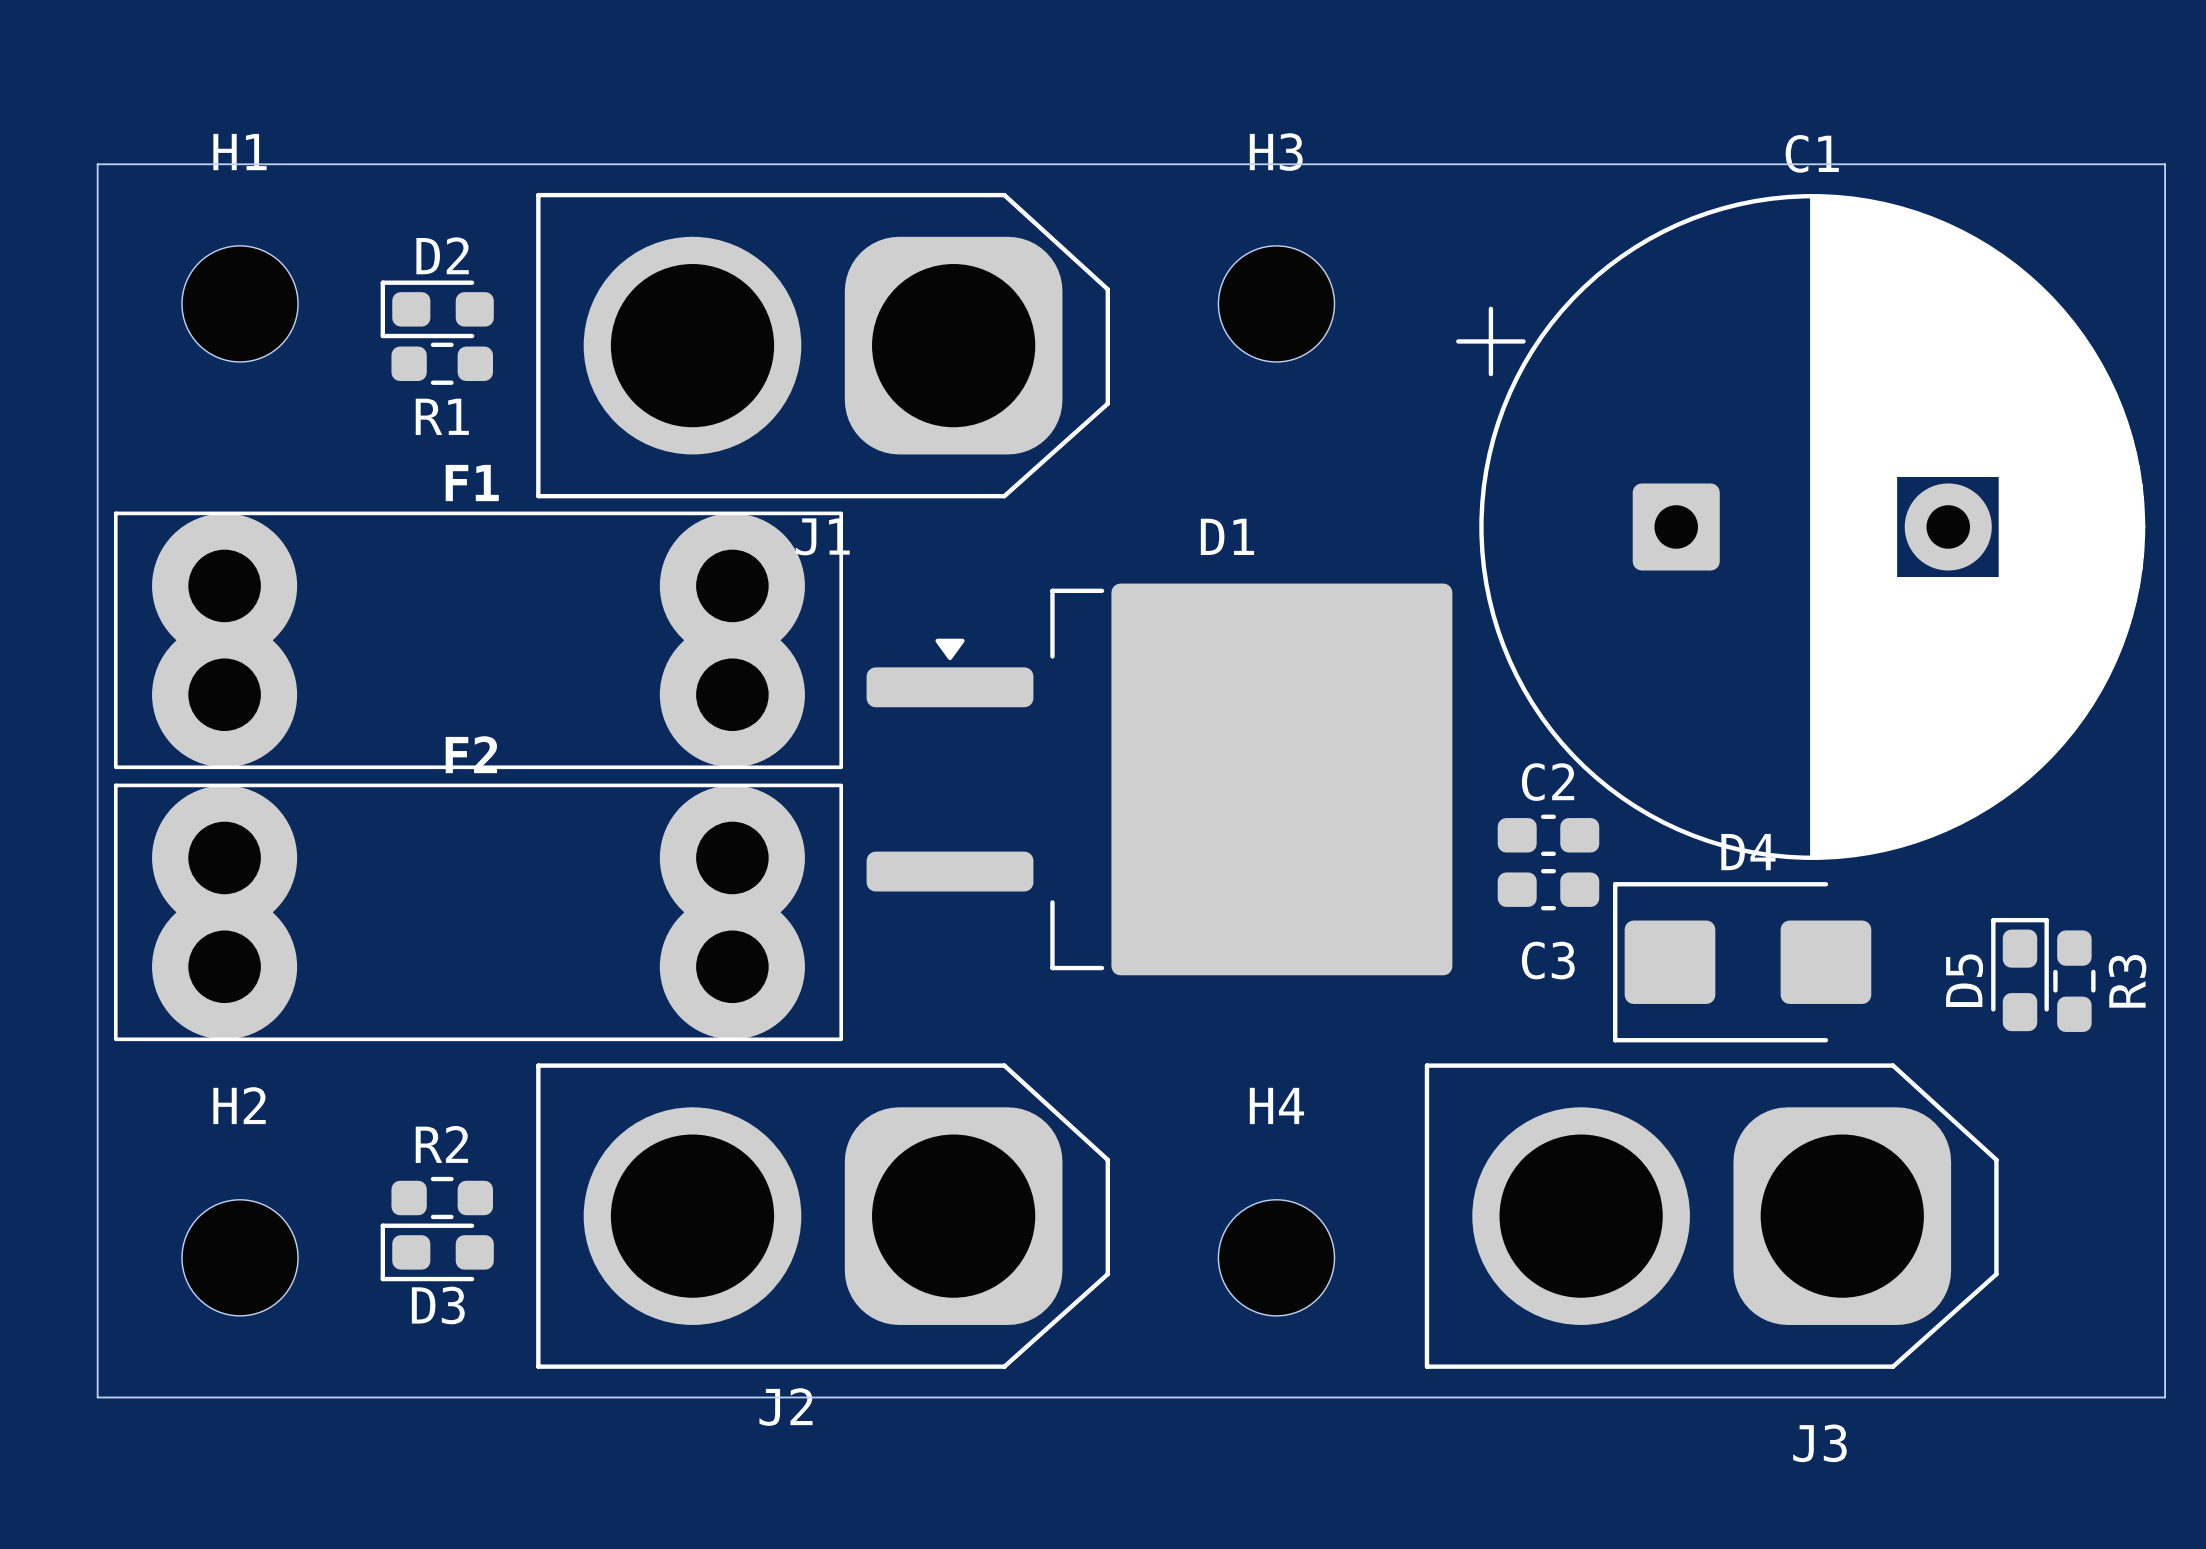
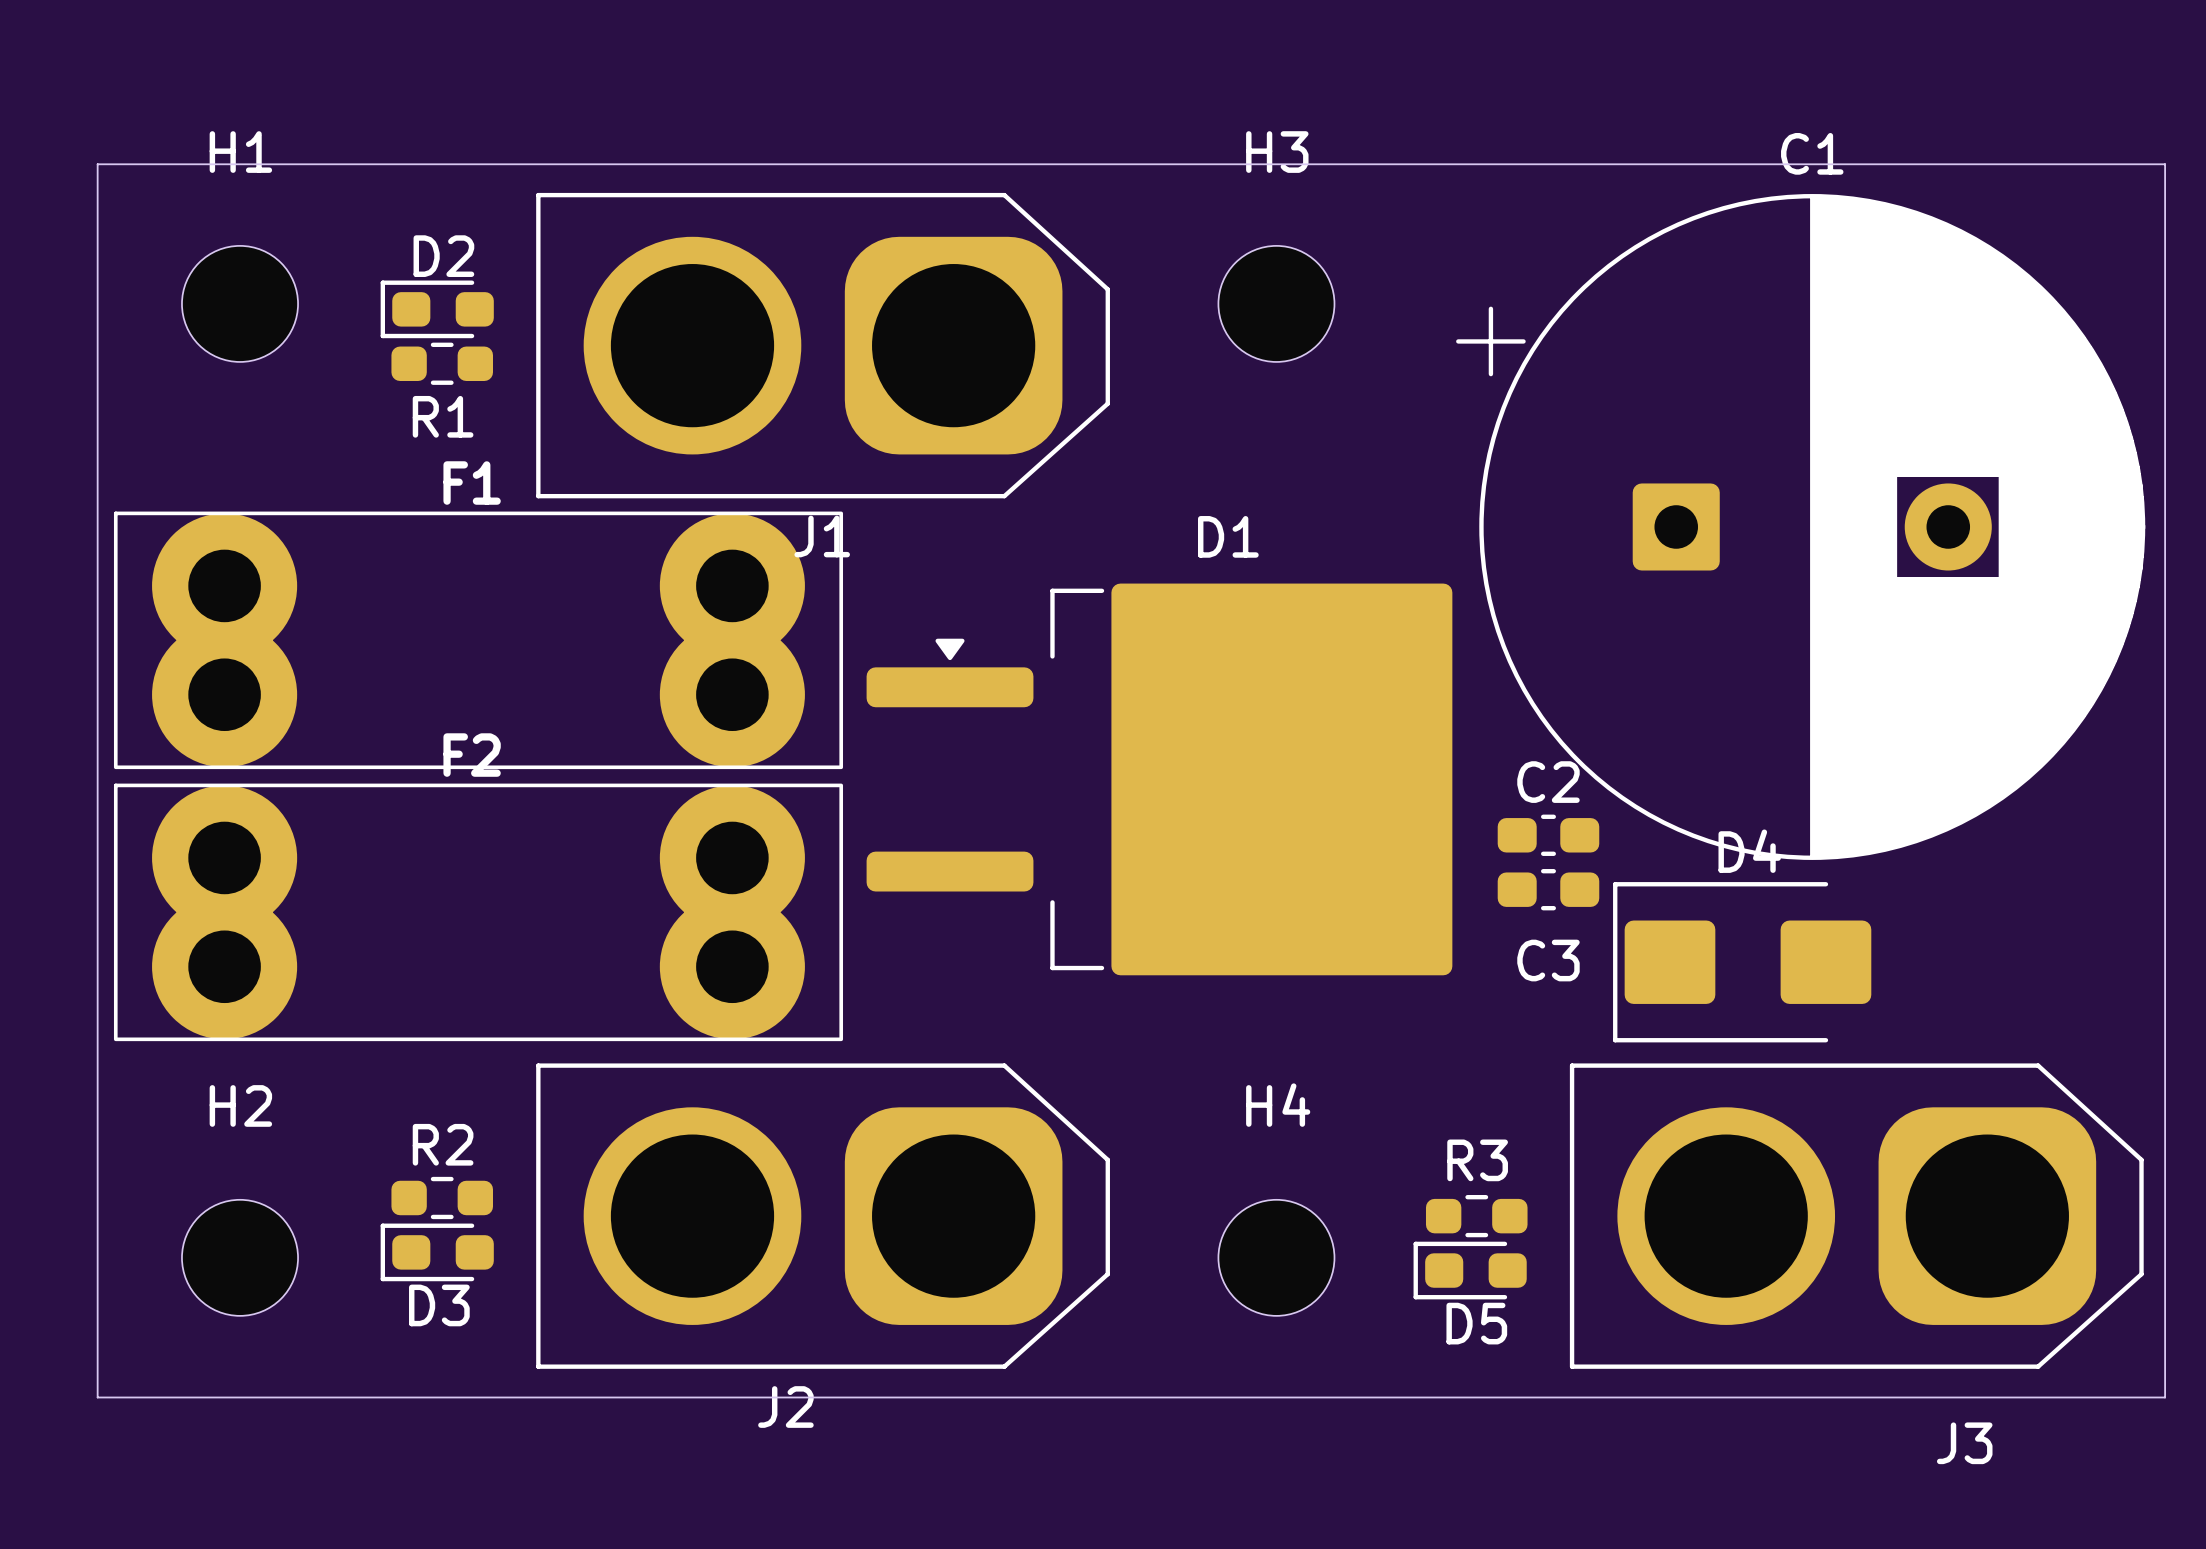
D5 rotation: 0° (2020, 974) -> 90° counterclockwise (1470, 1270)
D5 position: (2020, 974) -> (1470, 1270)
R3 rotation: 0° (2074, 981) -> 90° clockwise (1476, 1216)
R3 position: (2074, 981) -> (1476, 1216)
R3 name position: R3 (2127, 981) -> R3 (1477, 1160)
J3 position: (1711, 1216) -> (1856, 1216)

